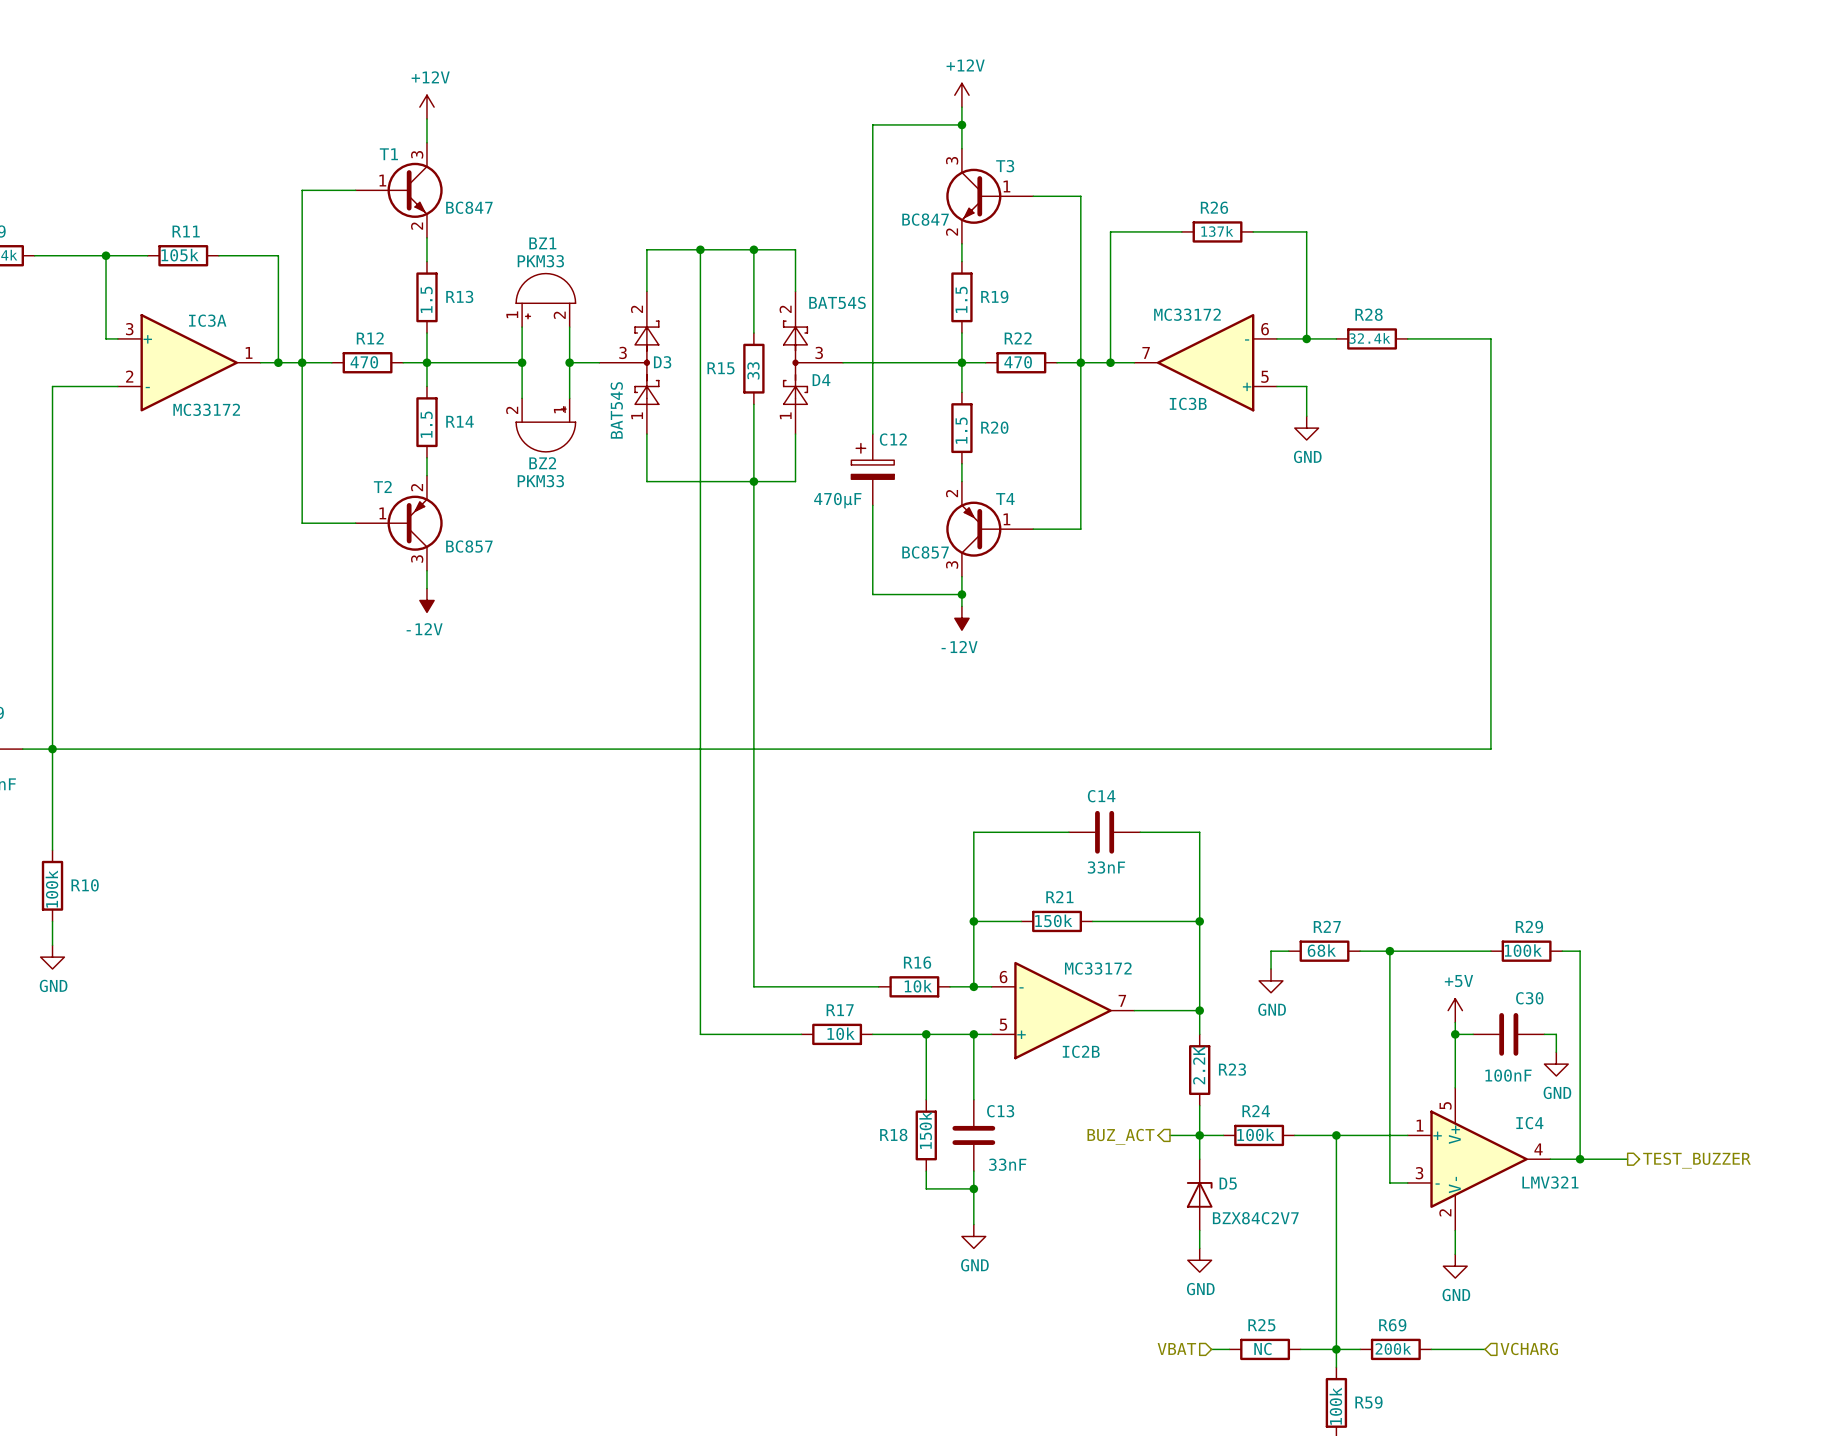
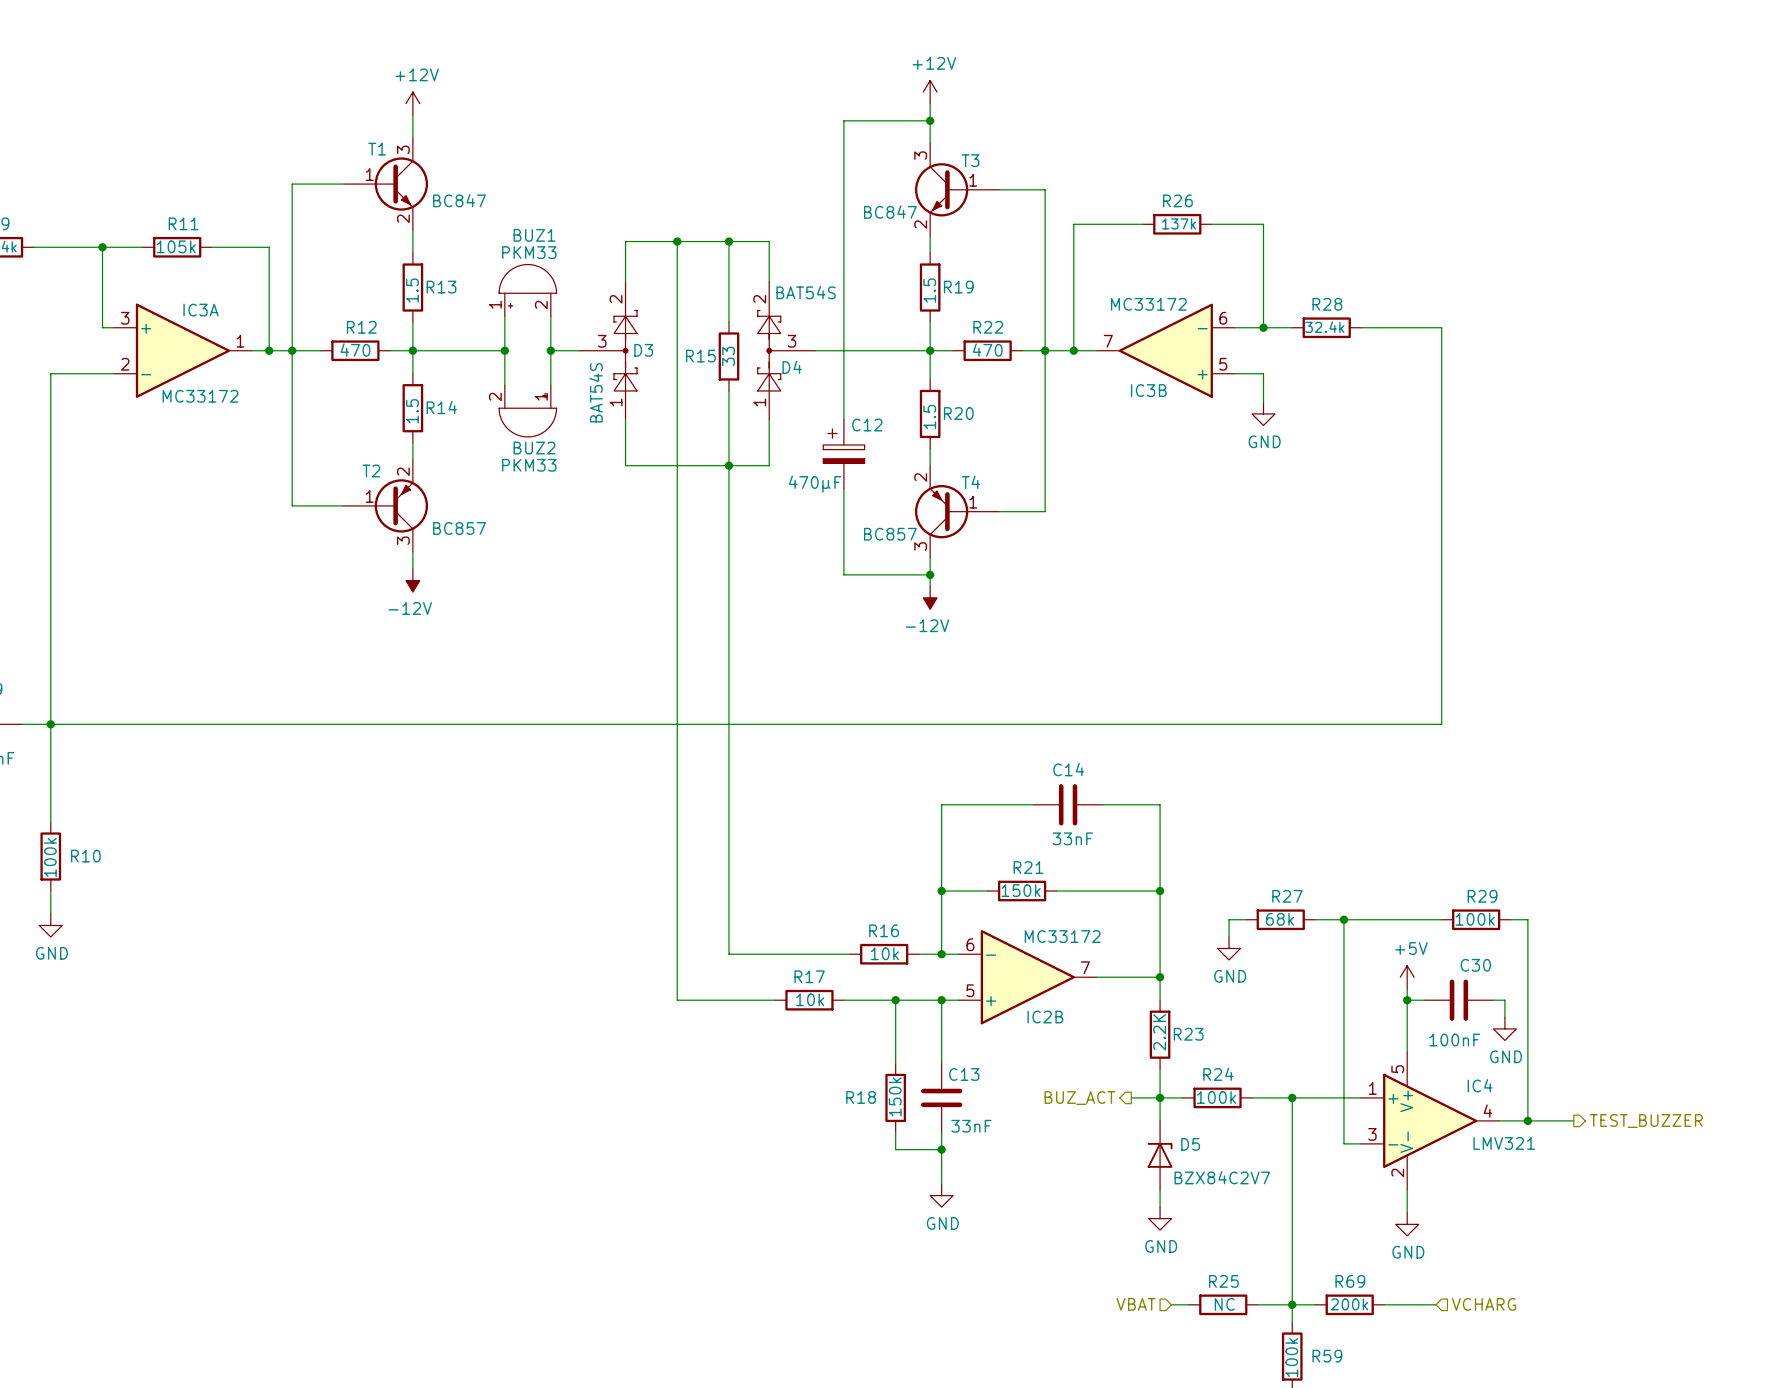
BZ1 name: BZ1 (542, 243) -> BUZ1 (534, 235)
BZ2 name: BZ2 (542, 463) -> BUZ2 (534, 448)

